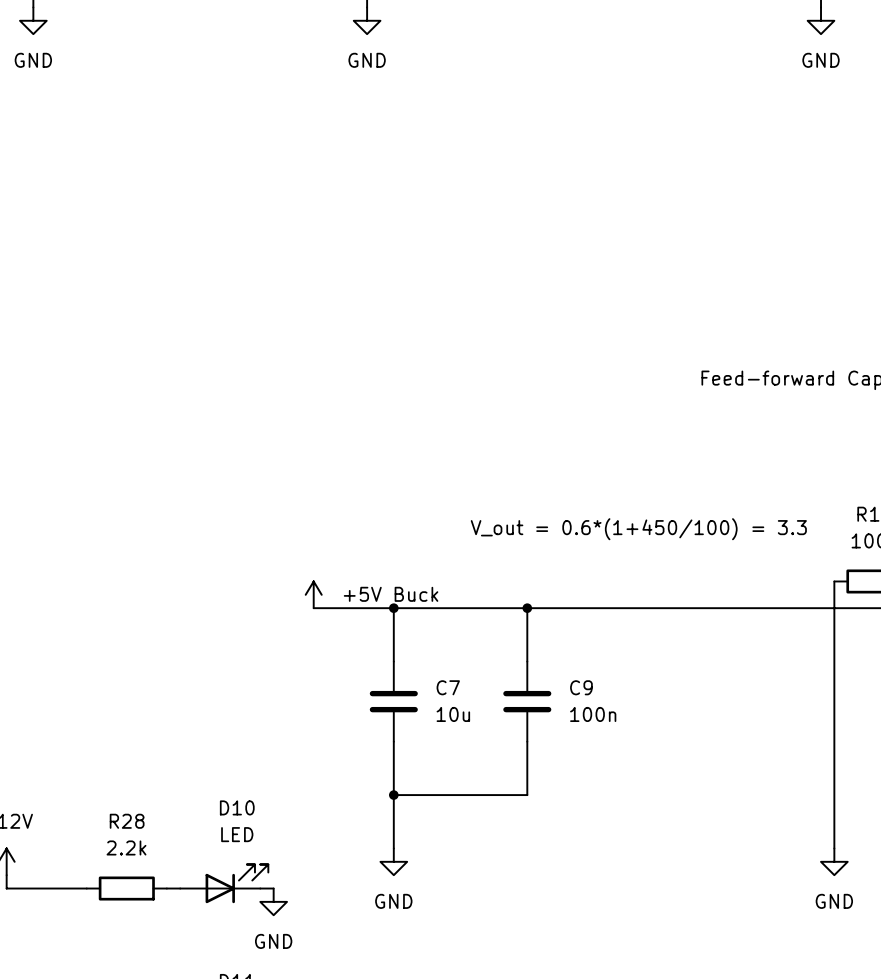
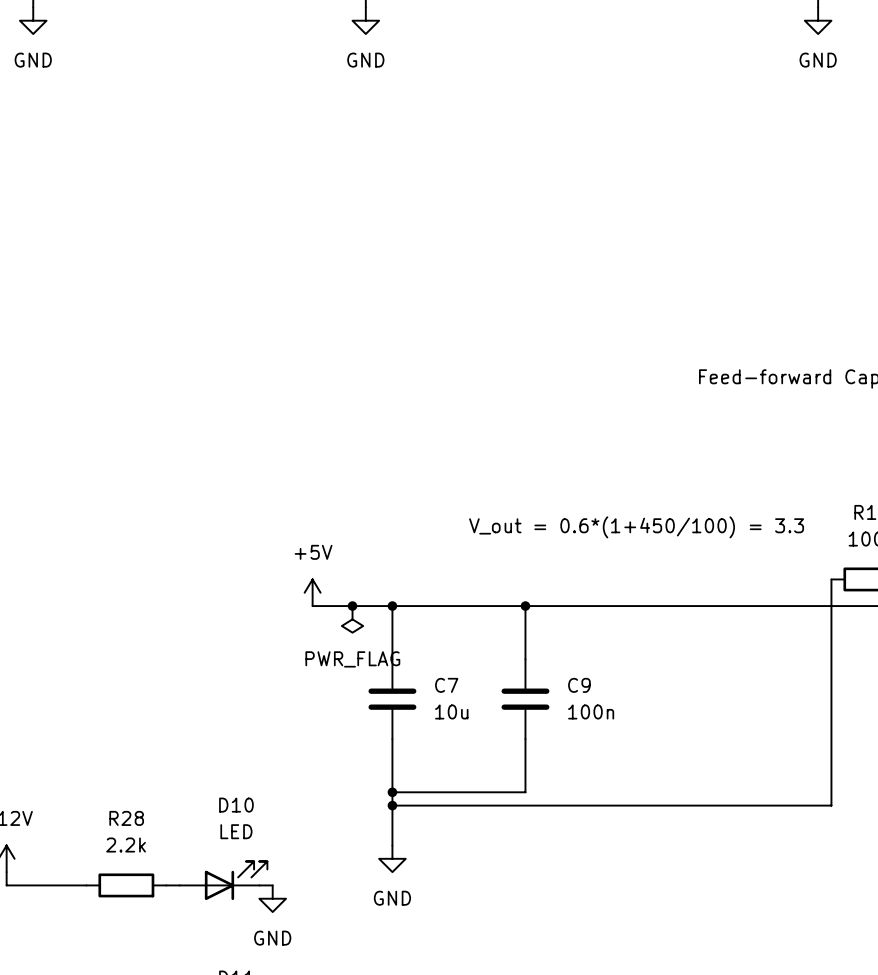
power symbol: +5V Buck (313, 594) -> +5V (312, 592)
junction: none -> (352, 606)
power symbol: none -> PWR_FLAG (352, 619)
junction: none -> (392, 805)
wire: (834, 808) (834, 848) -> (831, 805) (392, 805)
power symbol: GND (834, 861) -> none

